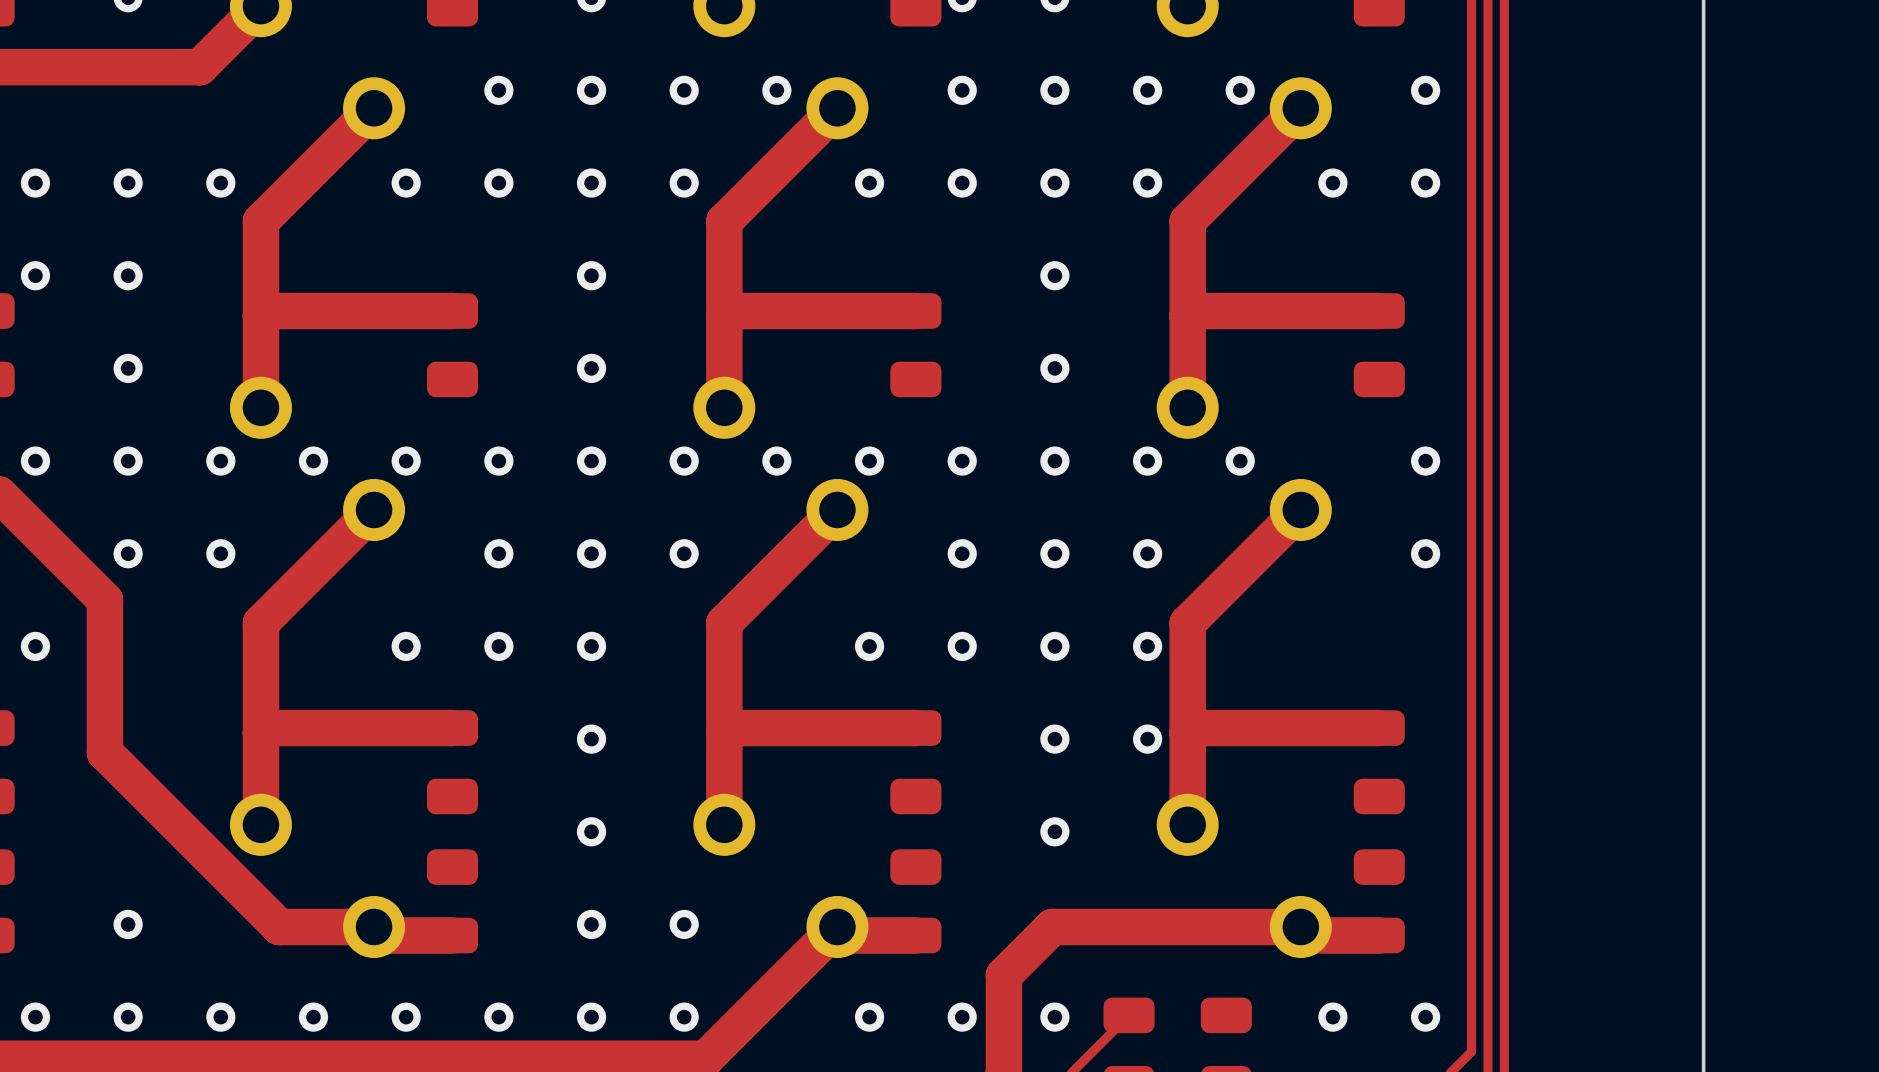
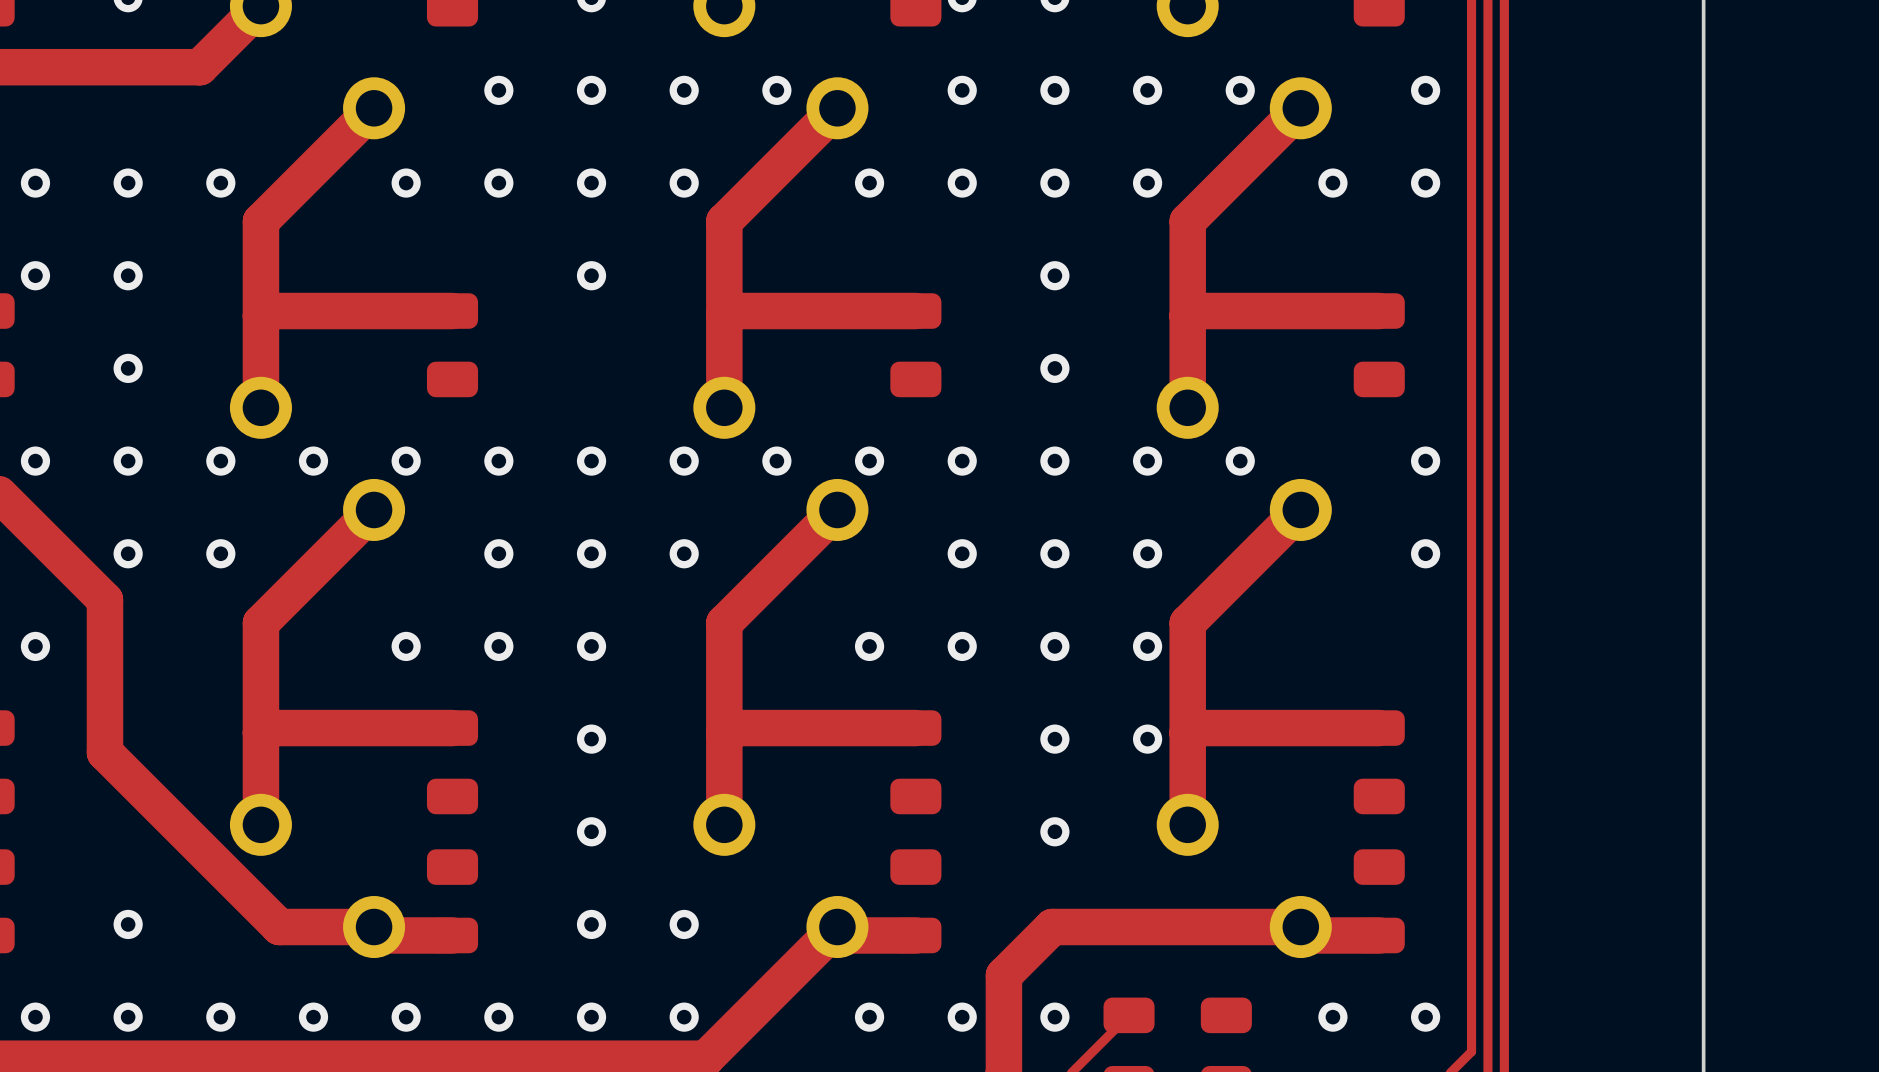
via: (591, 368) -> none

